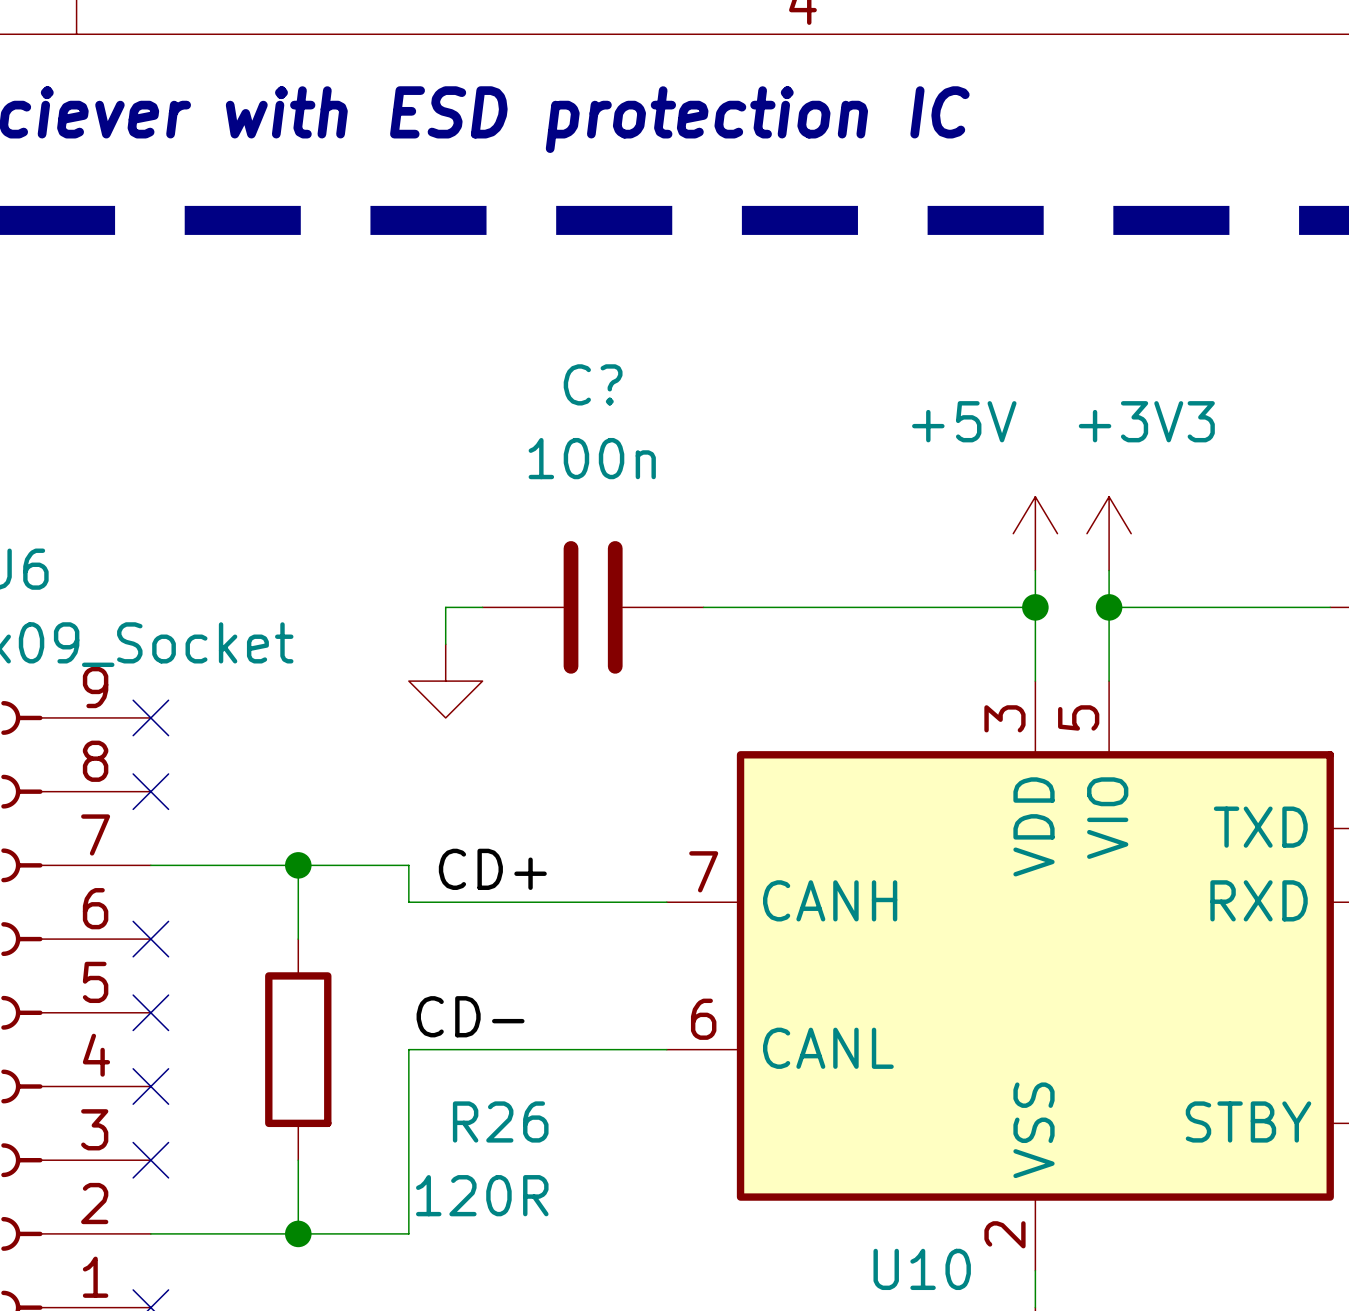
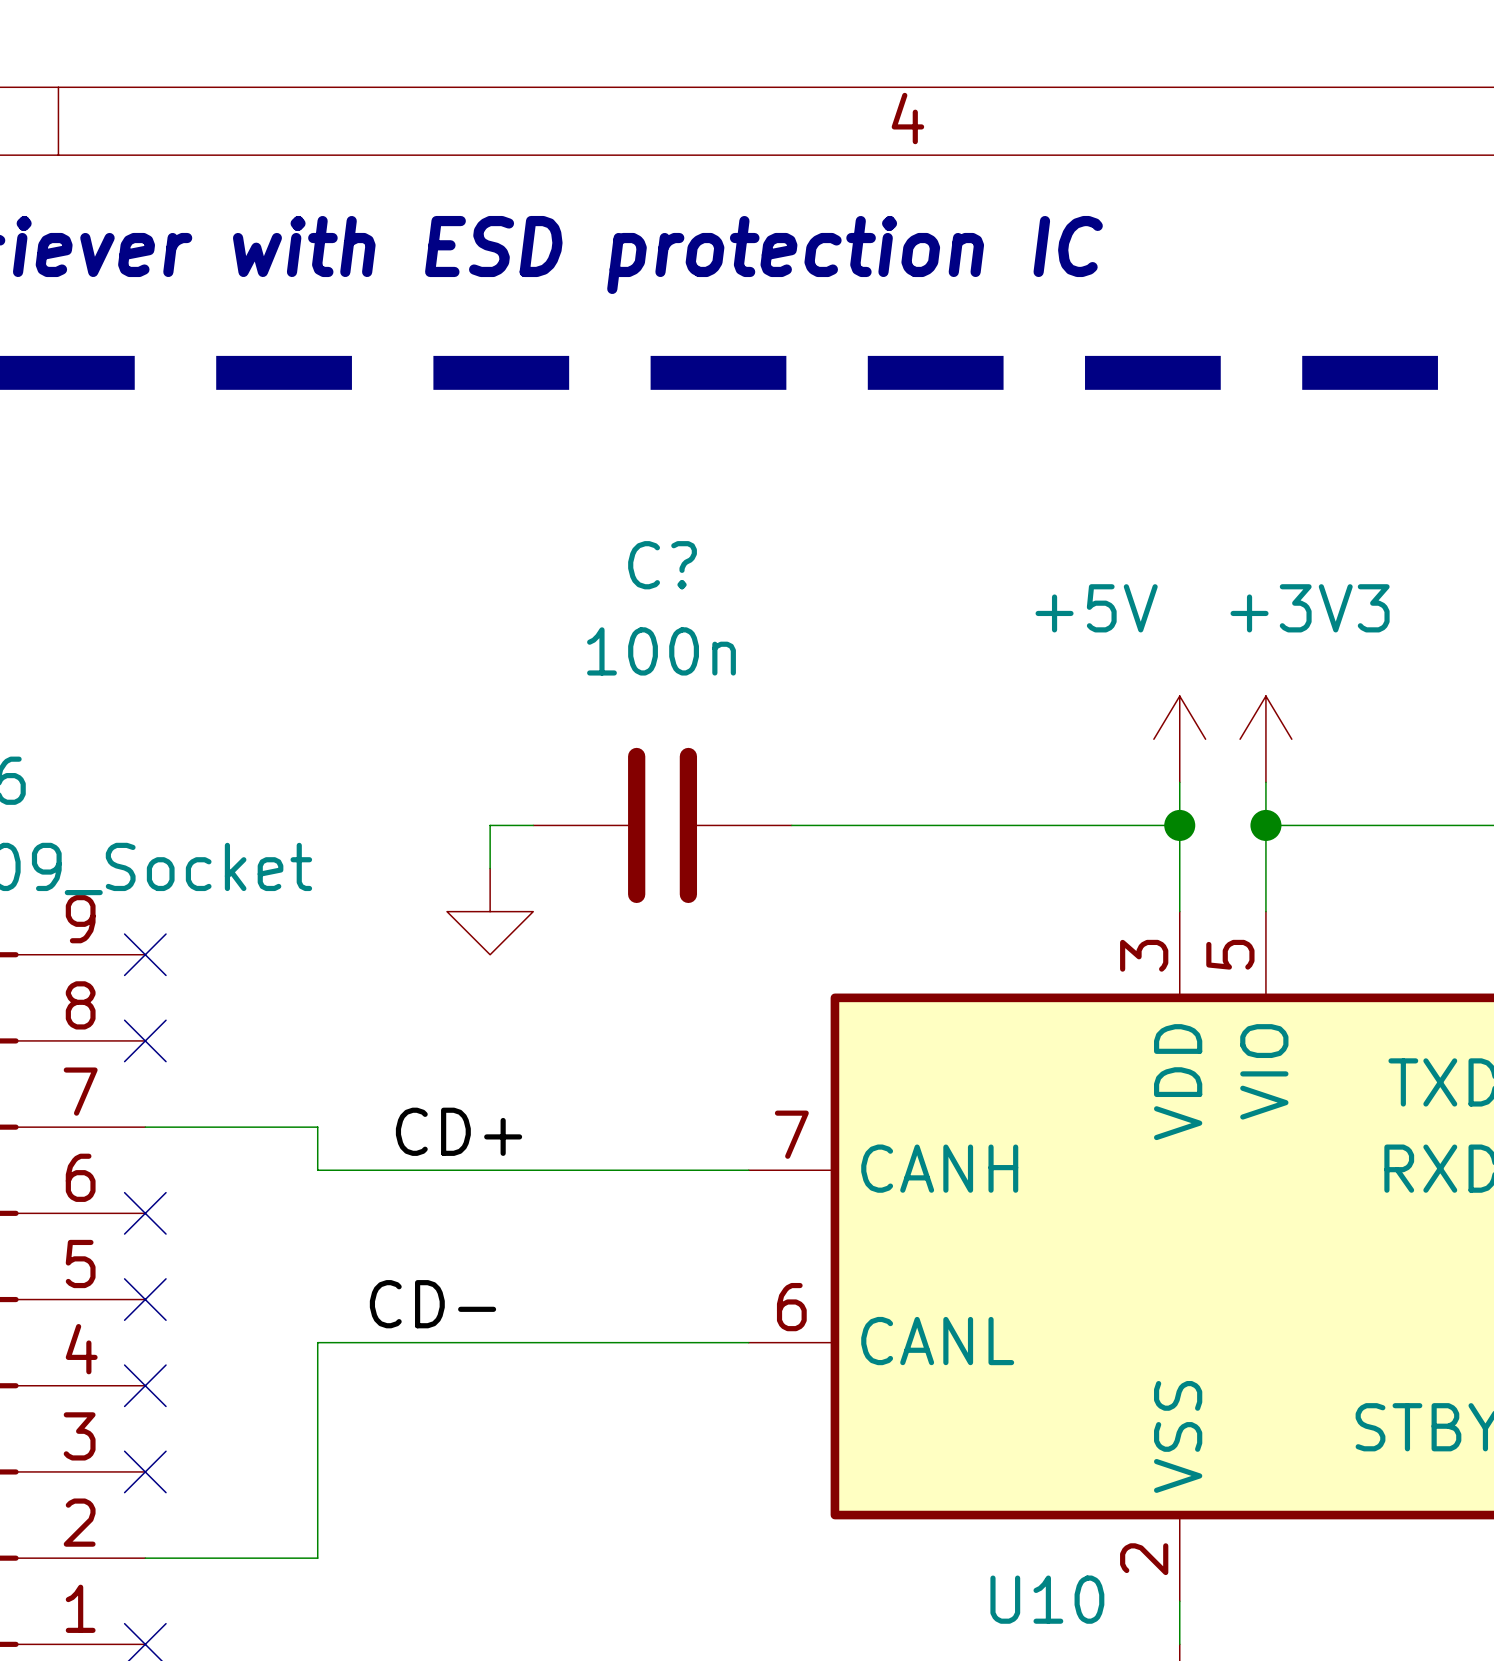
wire: (298, 865) (408, 865) (408, 902) -> (317, 1170) (447, 1170)
junction: (298, 865) -> none
label position: CD+ (492, 869) -> CD+ (459, 1131)
wire: (298, 902) (298, 939) -> none
label position: CD- (470, 1016) -> CD- (432, 1304)
R26: 120R (298, 1049) -> none
wire: (408, 1049) (408, 1233) (298, 1233) -> (447, 1342) (317, 1342) (317, 1471)
junction: (298, 1233) -> none

